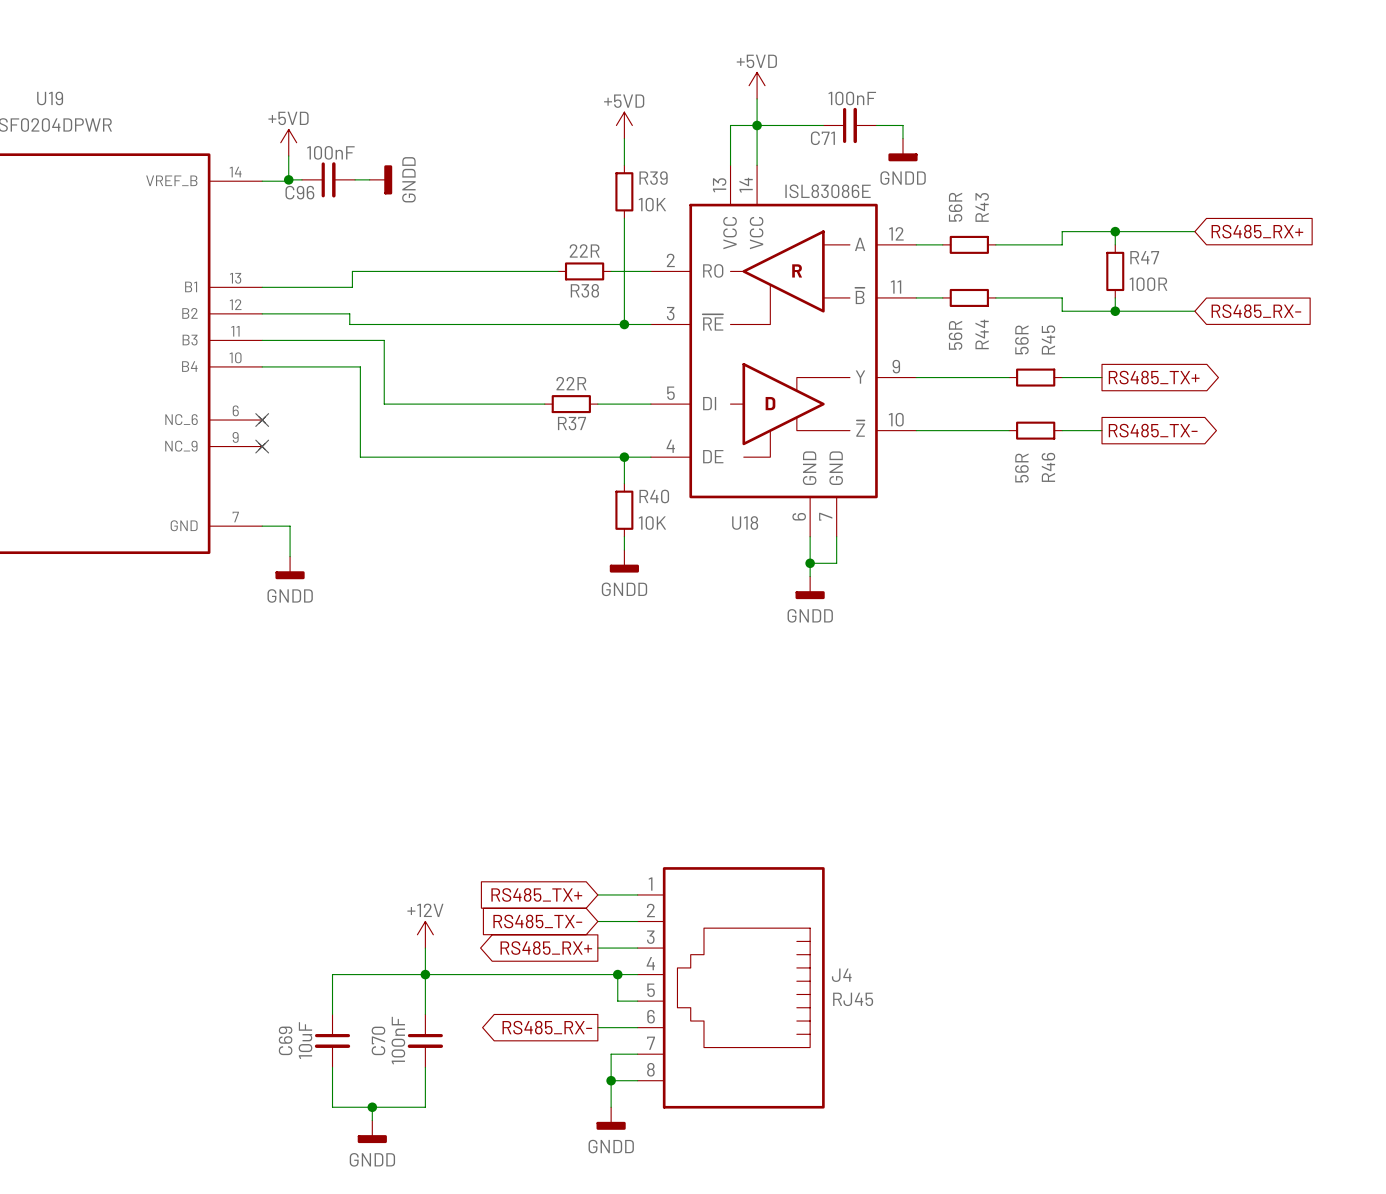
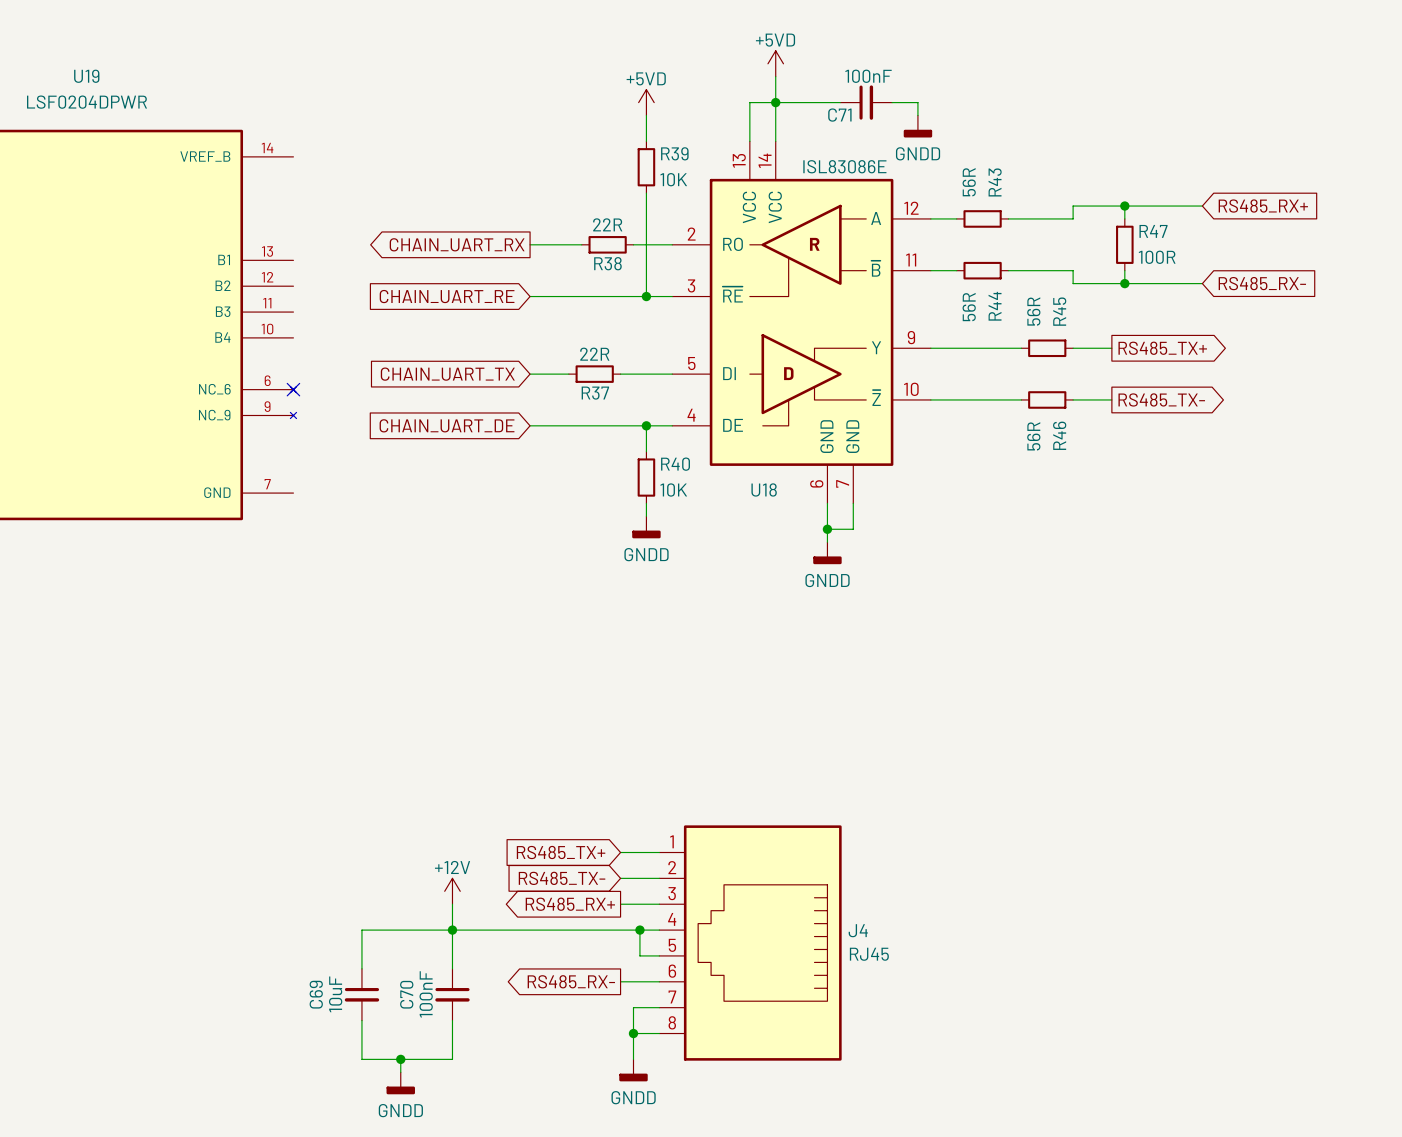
power symbol: +5VD (288, 142) -> none
wire: (288, 156) (288, 181) (262, 181) -> none
wire: (288, 179) (301, 179) -> none
junction: (288, 179) -> none
C96: 100nF (328, 179) -> none
wire: (355, 179) (369, 179) -> none
power symbol: GNDD (380, 179) -> none
global label: none -> CHAIN_UART_RX (457, 244)
wire: (504, 271) (352, 271) (352, 287) (262, 287) -> none
wire: (262, 313) (349, 313) (349, 324) (504, 324) -> none
global label: none -> CHAIN_UART_RE (447, 296)
wire: (262, 340) (384, 340) (384, 404) (504, 404) -> none
wire: (262, 366) (360, 366) (360, 457) (504, 457) -> none
global label: none -> CHAIN_UART_TX (447, 374)
no-connect mark: (262, 446) -> none
global label: none -> CHAIN_UART_DE (447, 425)
wire: (262, 526) (290, 526) (290, 556) -> none
power symbol: GNDD (290, 567) -> none

